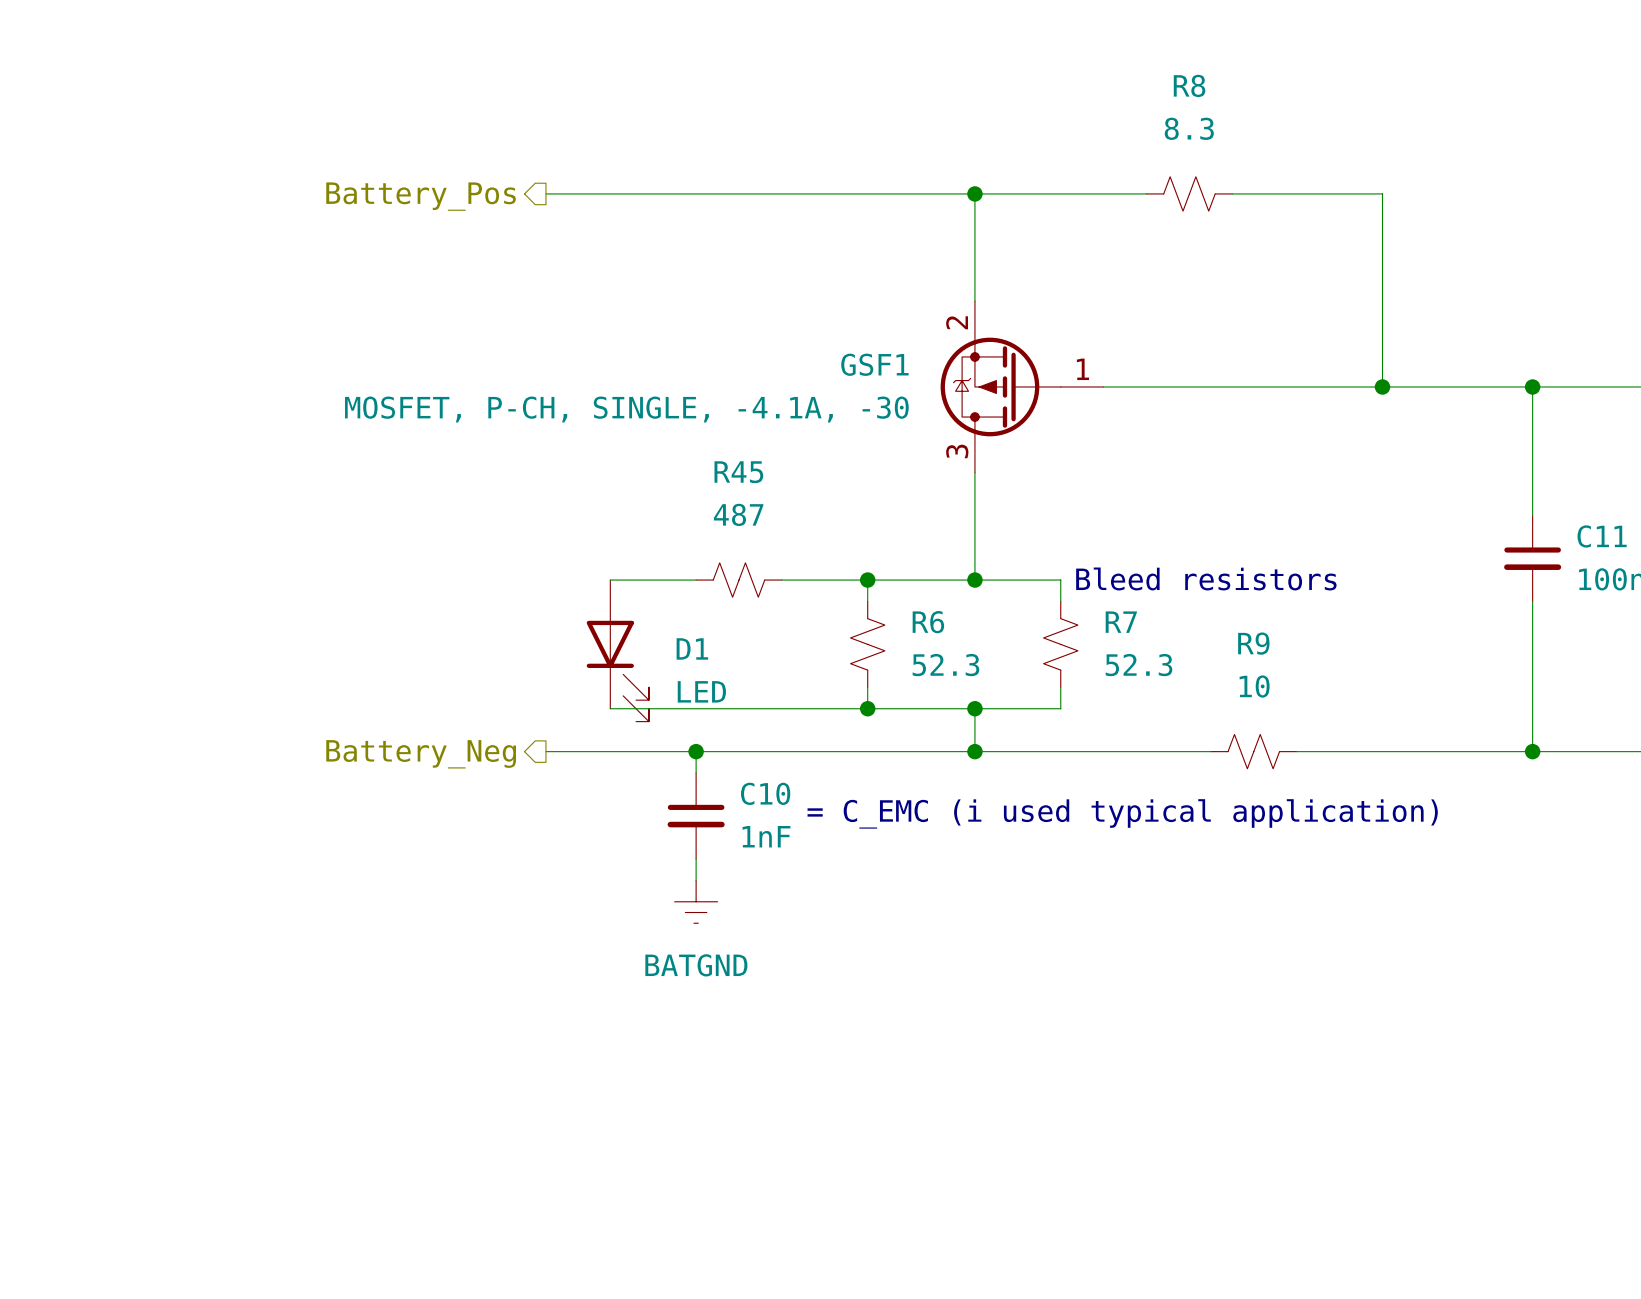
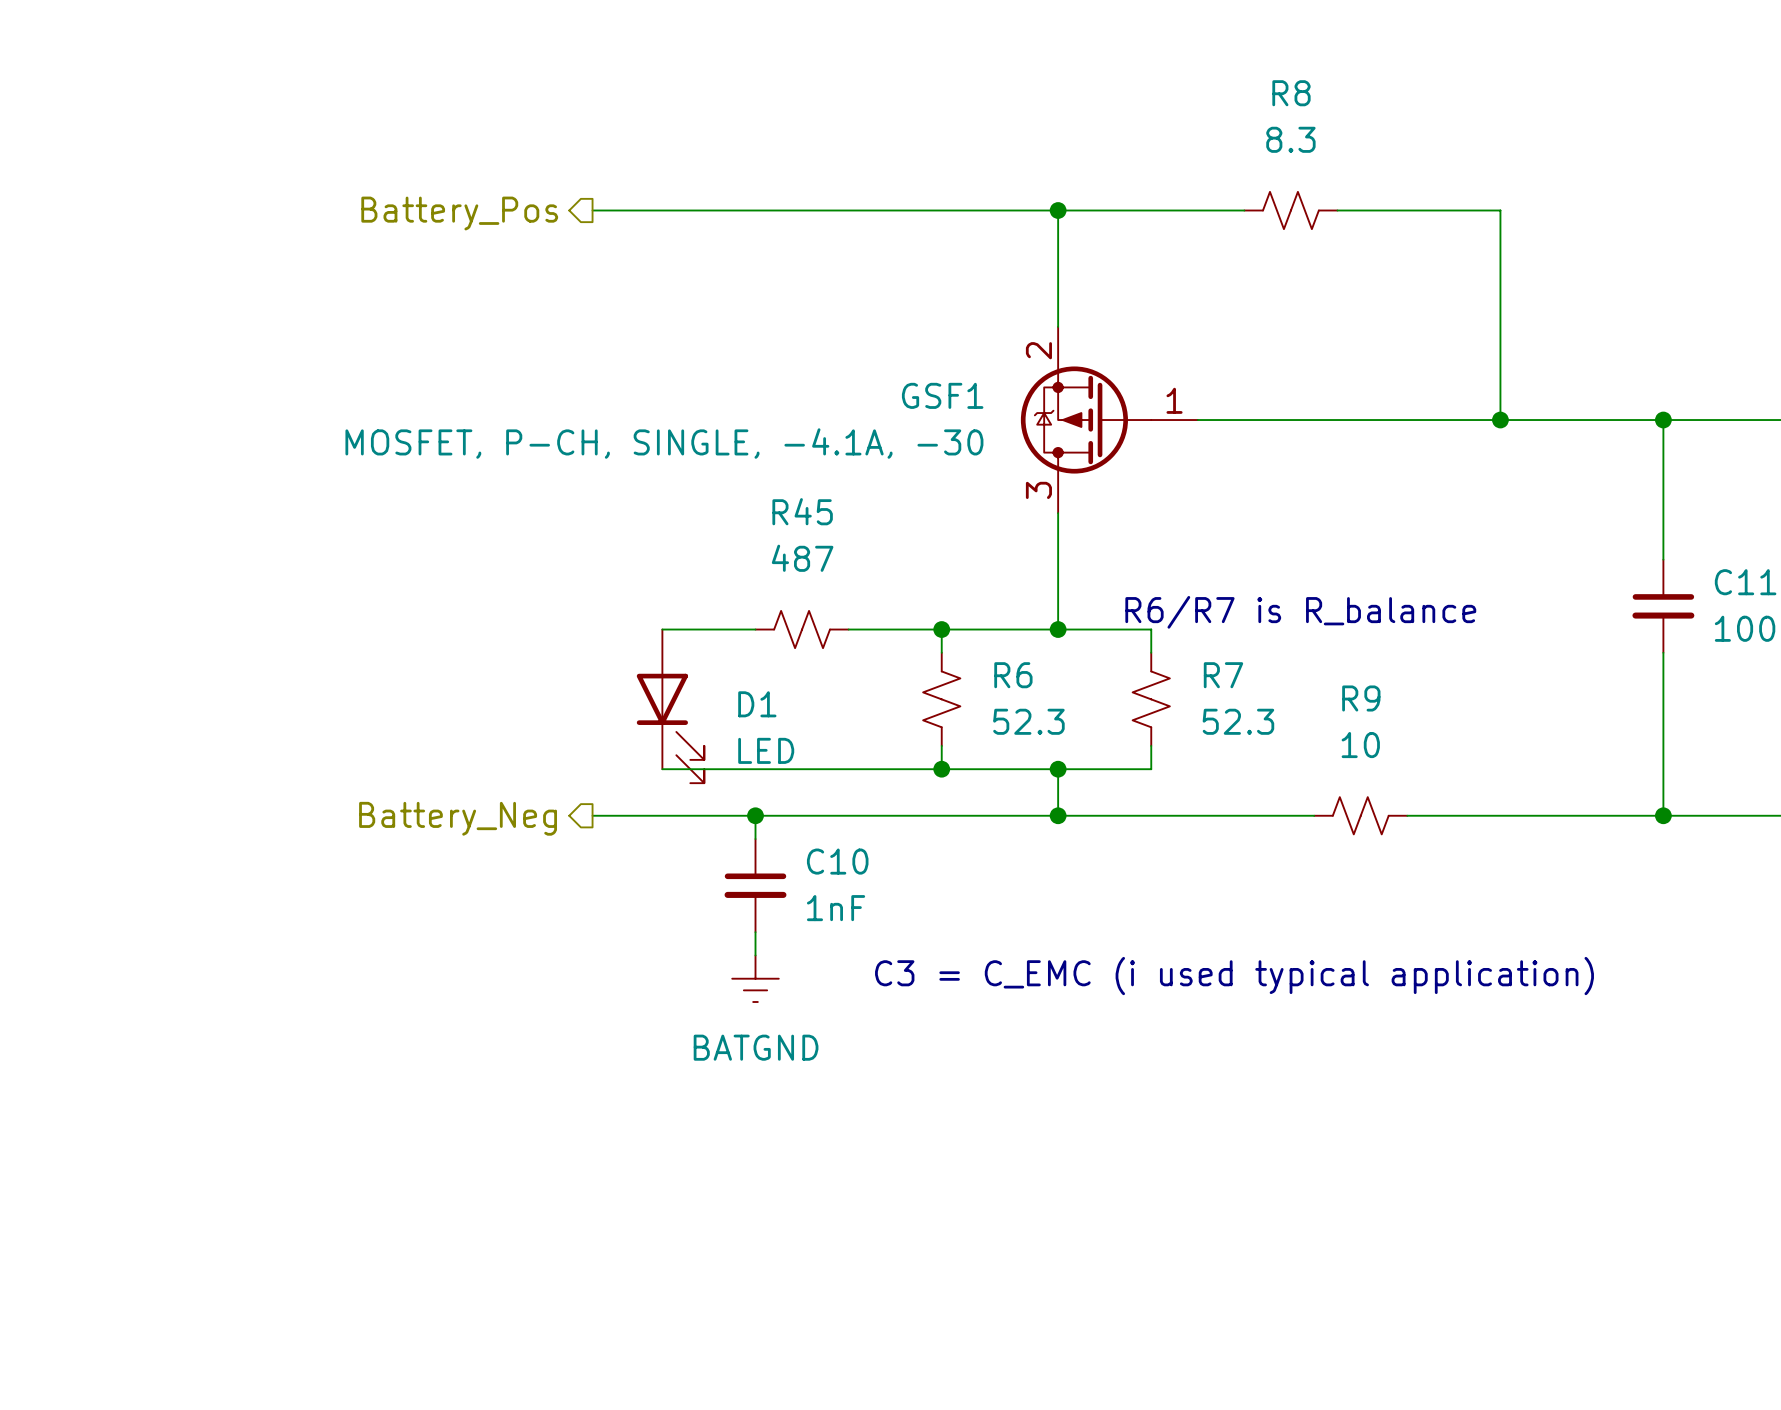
text: none -> R6/R7 is R_balance (1300, 612)
text: Bleed resistors (1206, 578) -> none
text: = C_EMC (i used typical application) (1122, 813) -> none
text: none -> C3 = C_EMC (i used typical application) (1234, 976)

